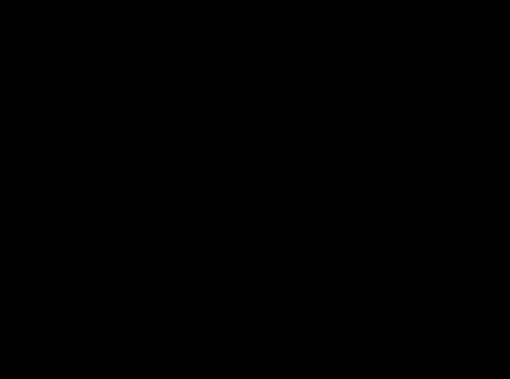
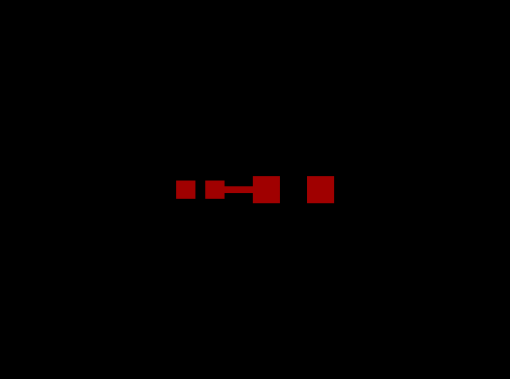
part: none -> (200, 189)
top track: none -> (266, 189) (214, 189)
part: none -> (293, 189)

